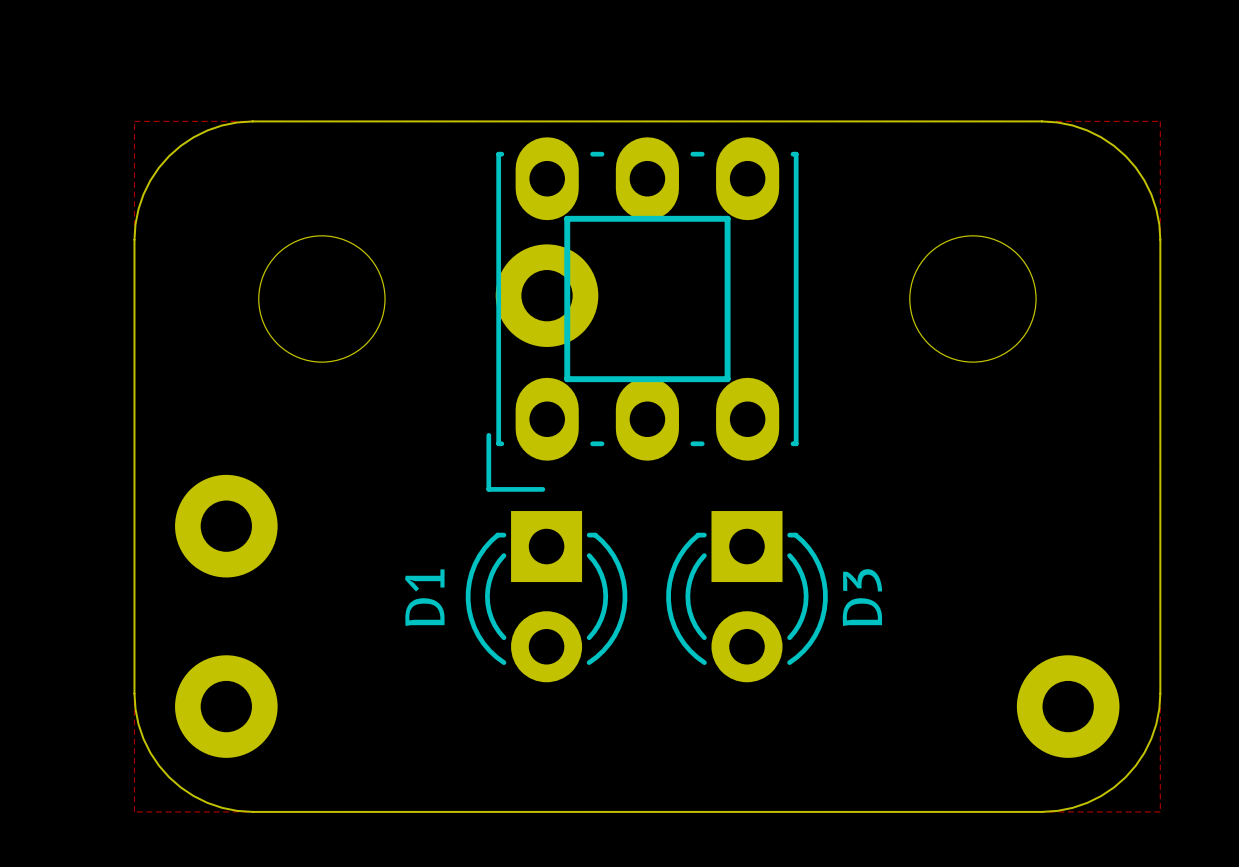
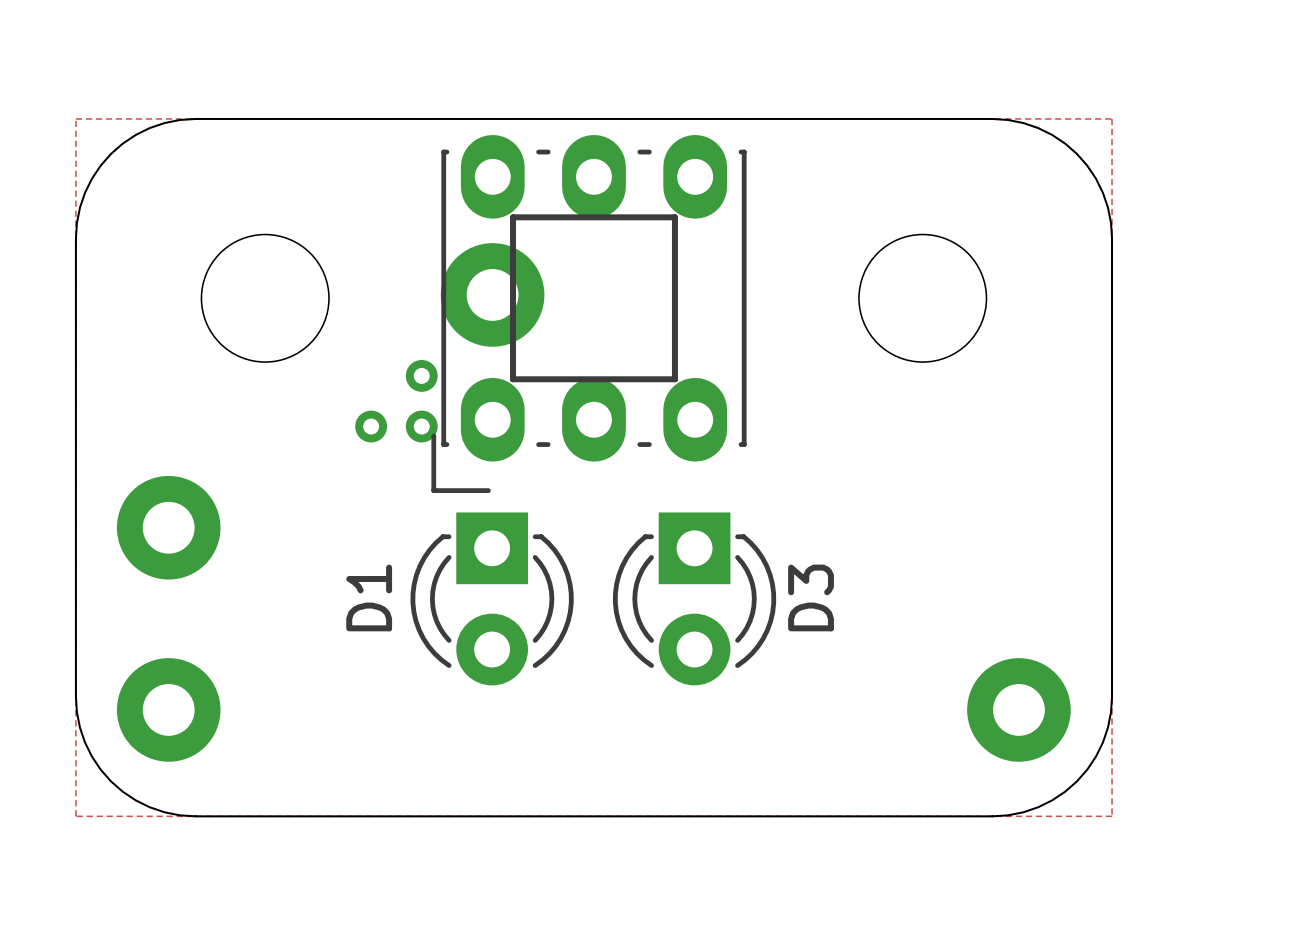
via: none -> (421, 375)
via: none -> (371, 426)
via: none -> (421, 426)

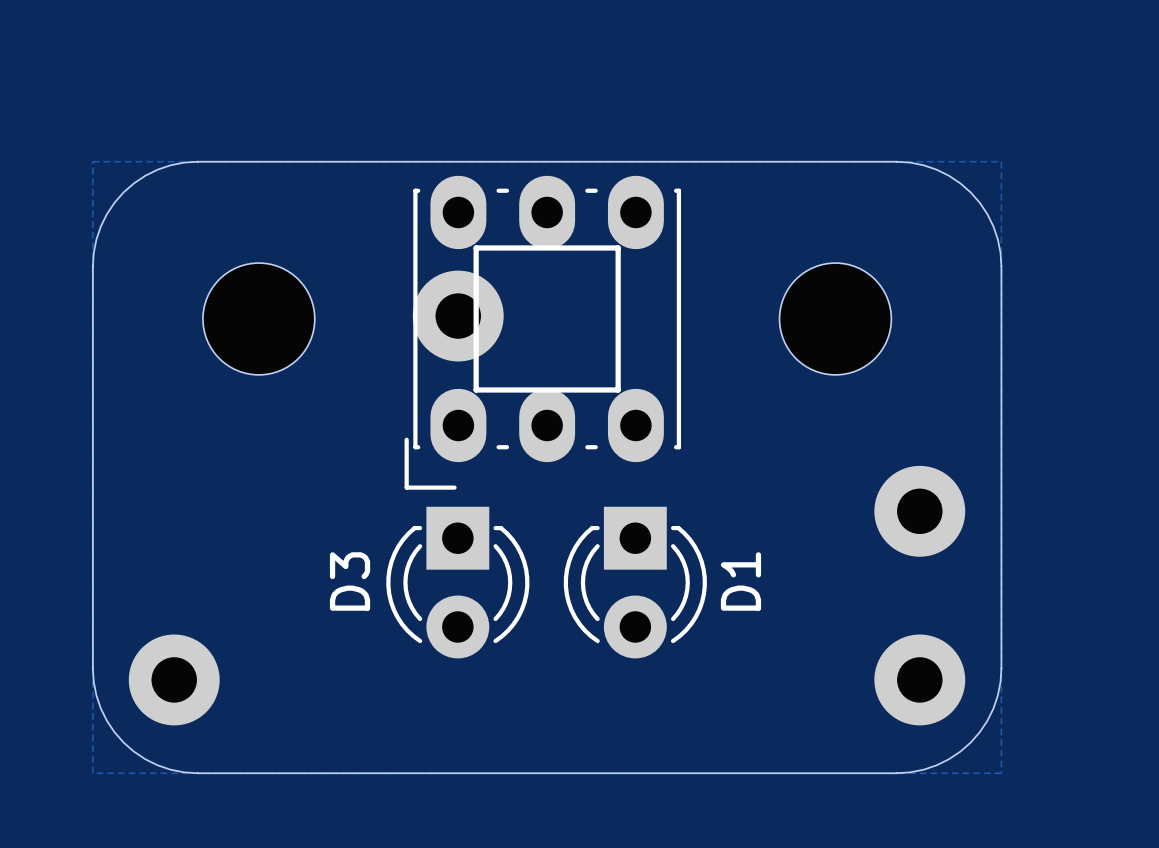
via: (421, 375) -> none
via: (371, 426) -> none
via: (421, 426) -> none
part position: (168, 527) -> (919, 511)
D1 name: D1 (369, 597) -> D3 (350, 581)
D3 name: D3 (811, 597) -> D1 (740, 581)

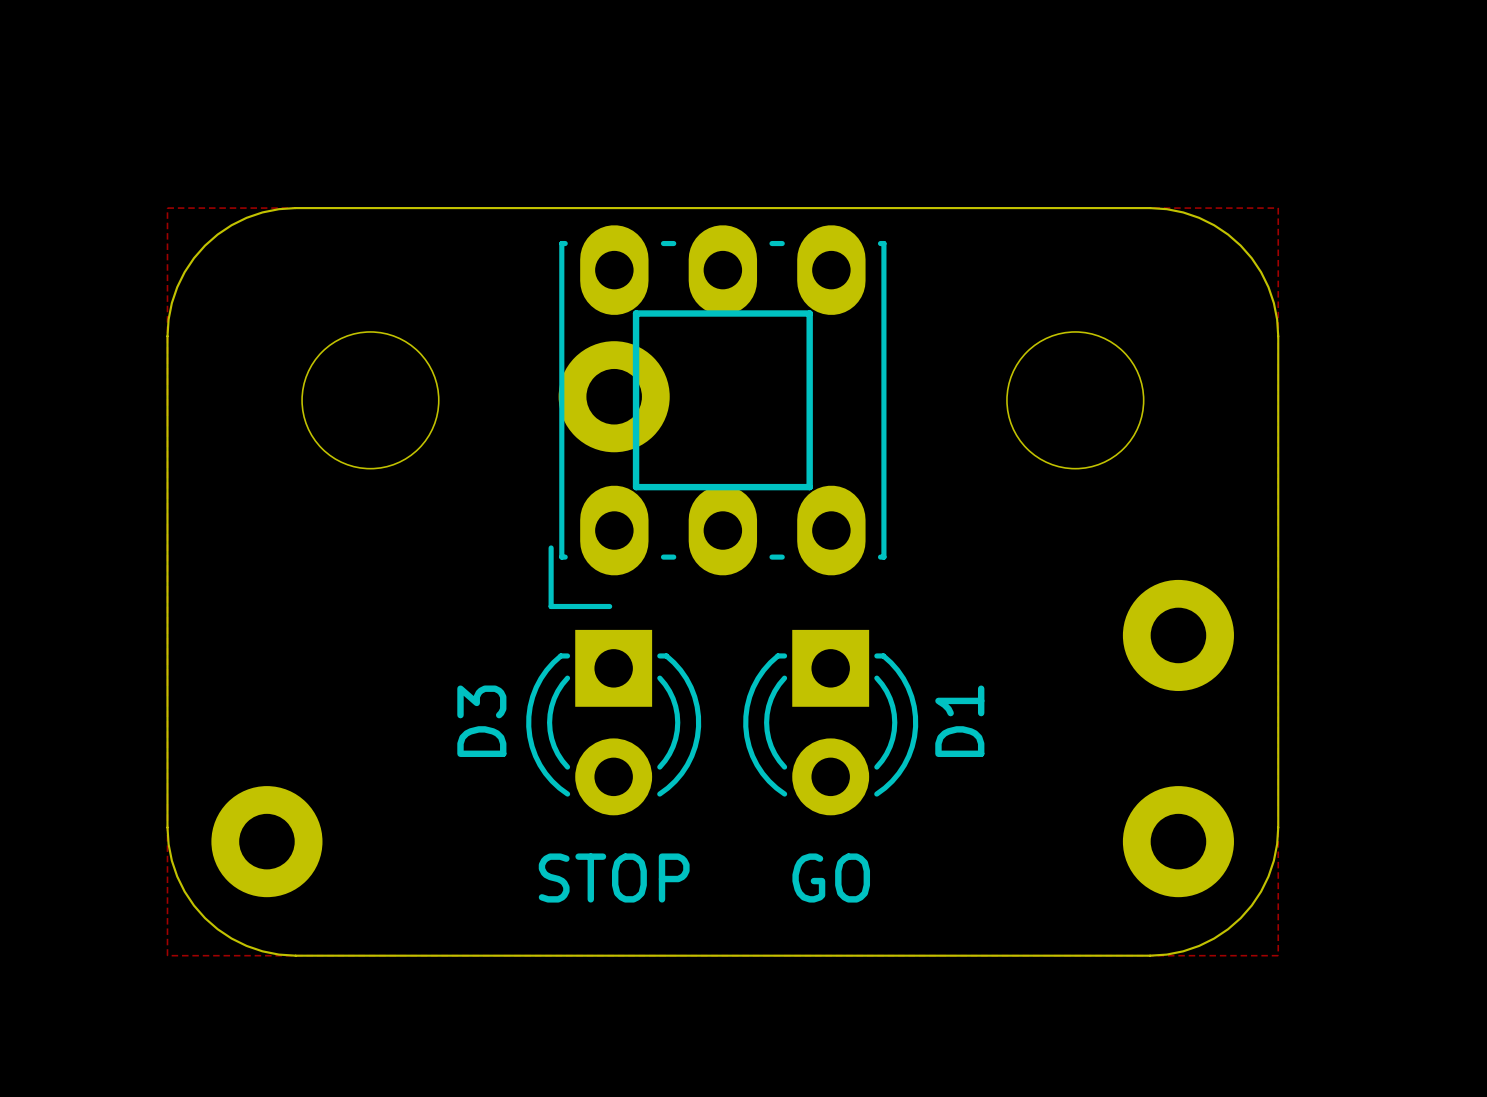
text: none -> STOP (614, 878)
text: none -> GO (831, 878)

